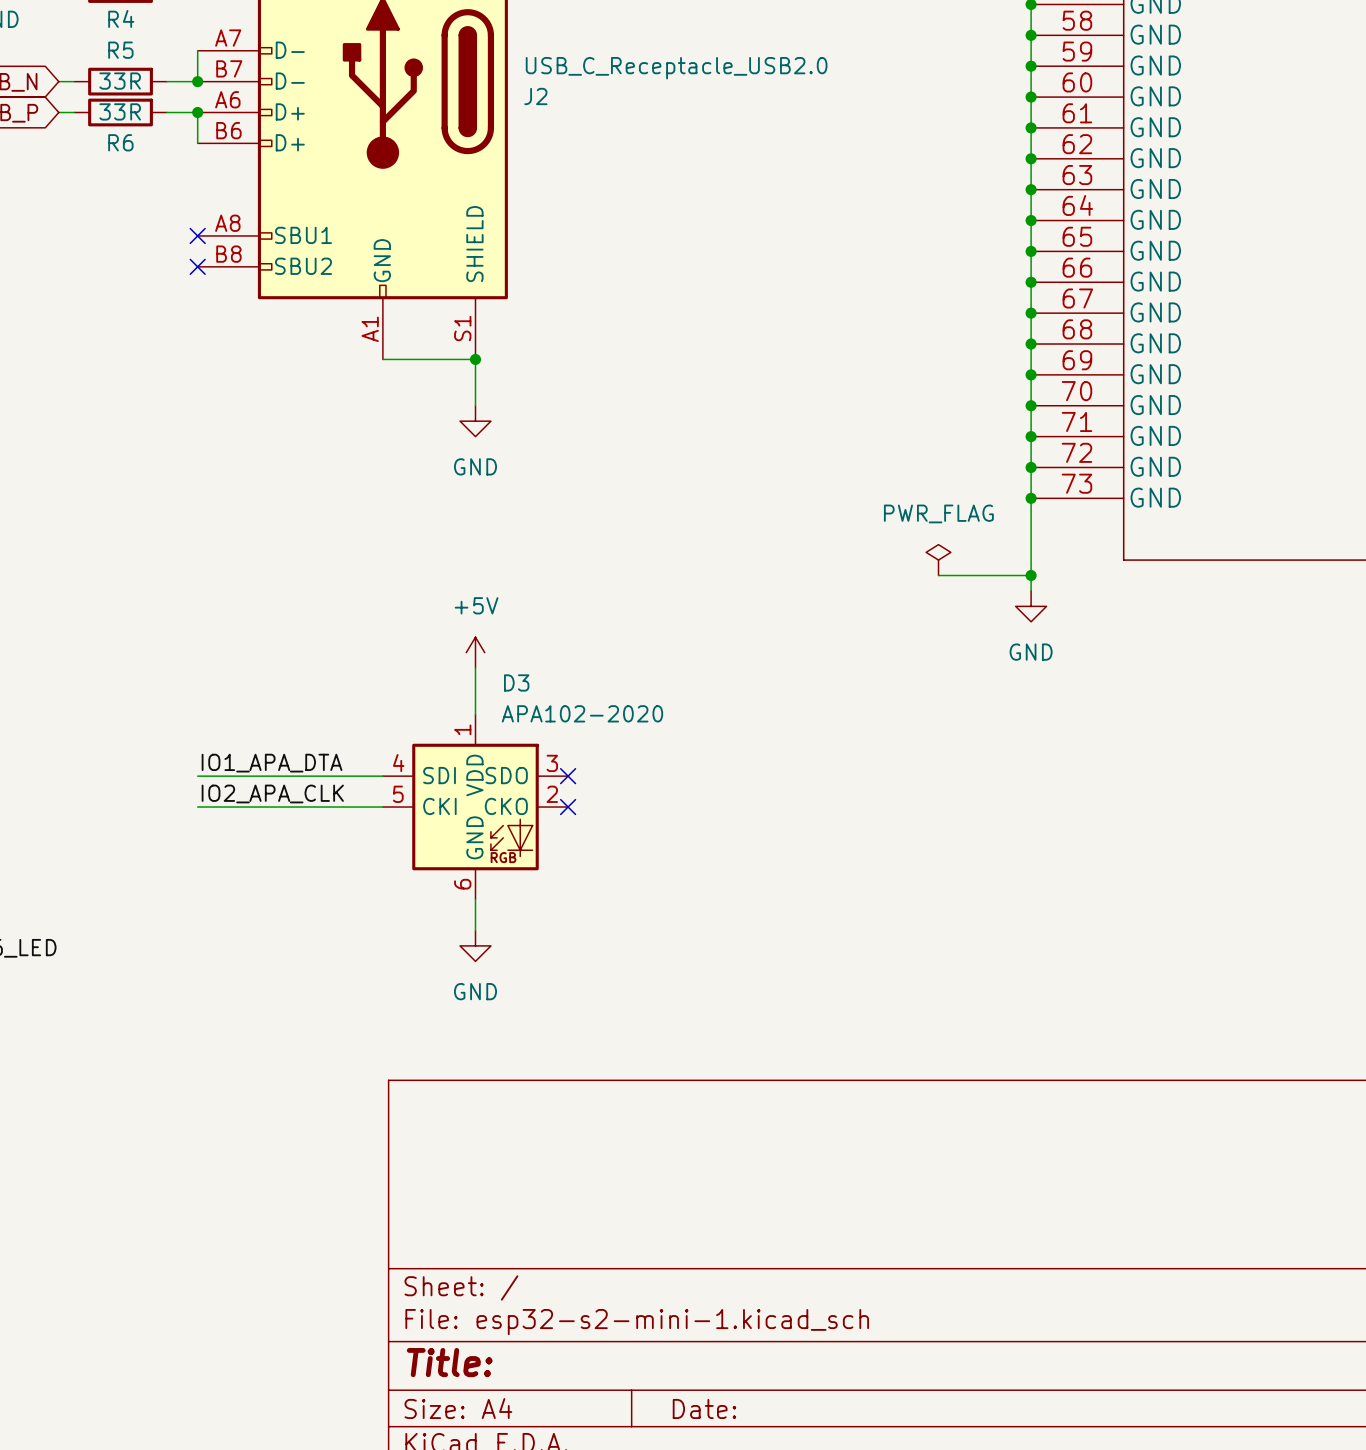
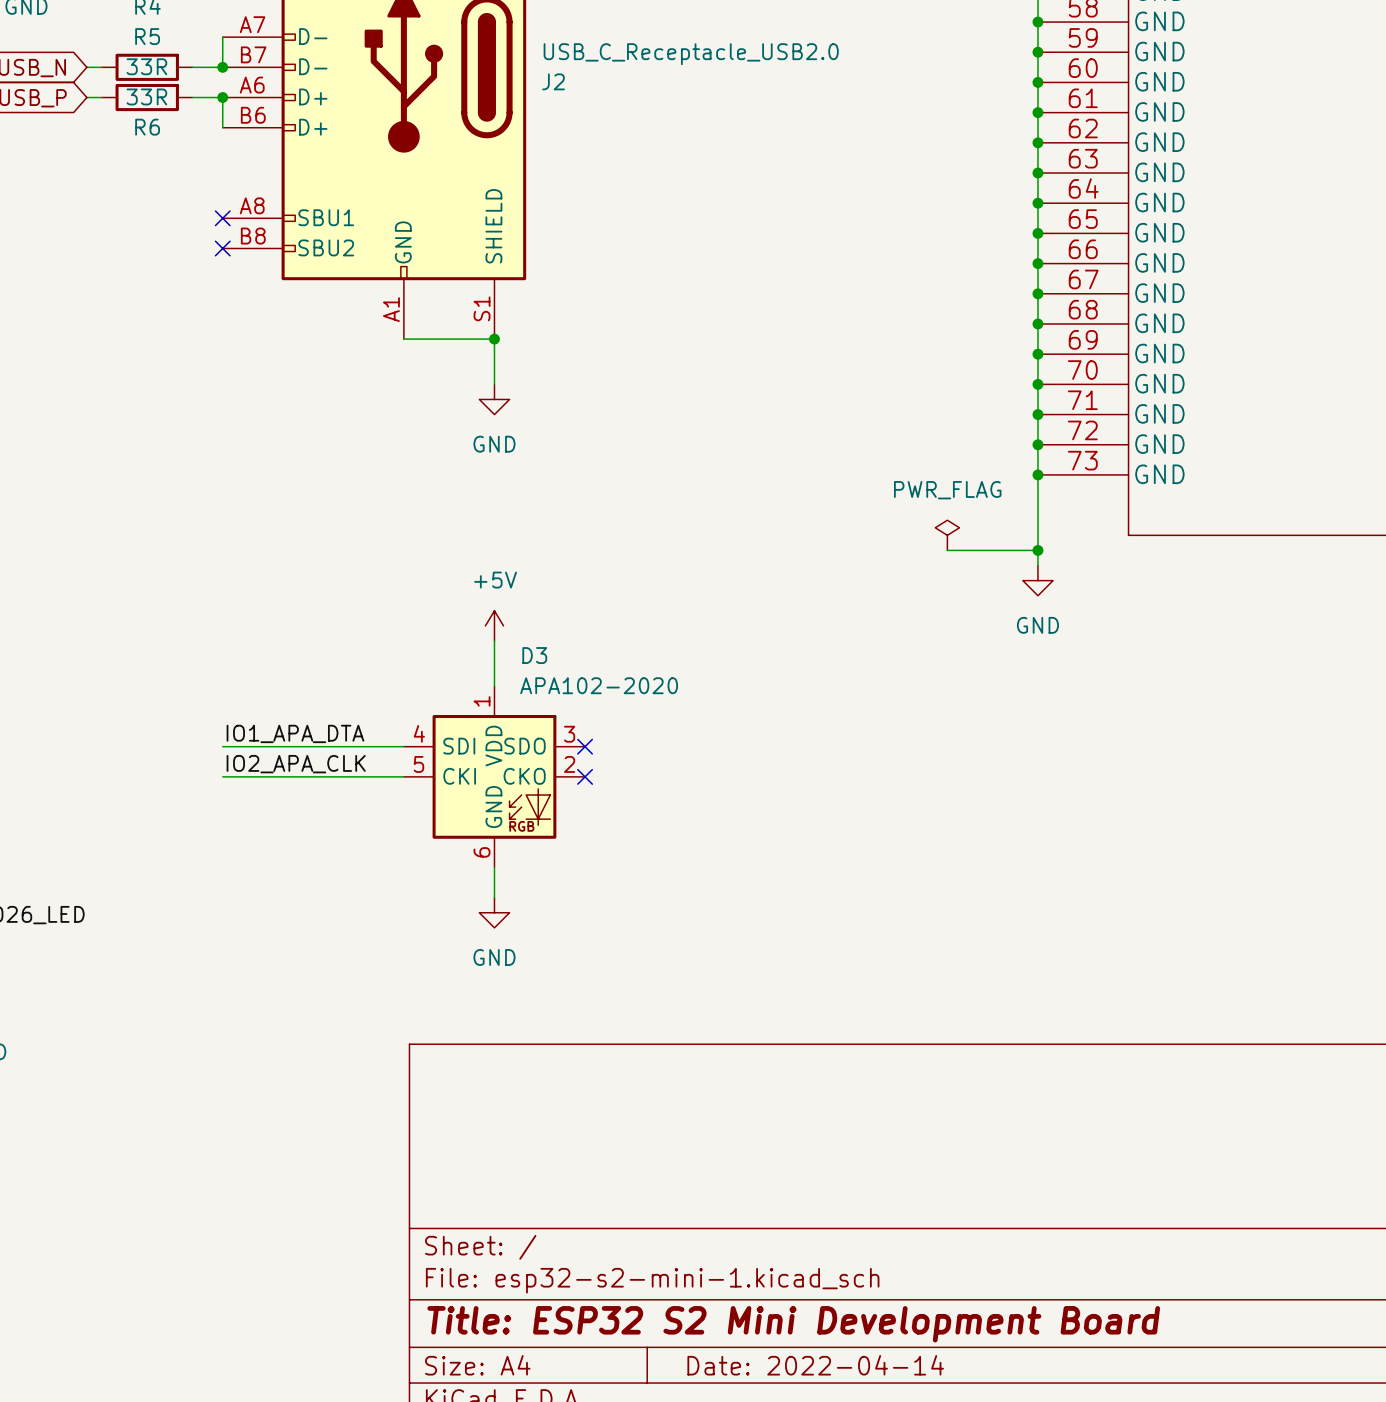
title block: Title: (449, 1362) -> Title: ESP32 S2 Mini Development Board (793, 1324)
title block: Date: (704, 1408) -> Date: 2022-04-14 (815, 1365)

